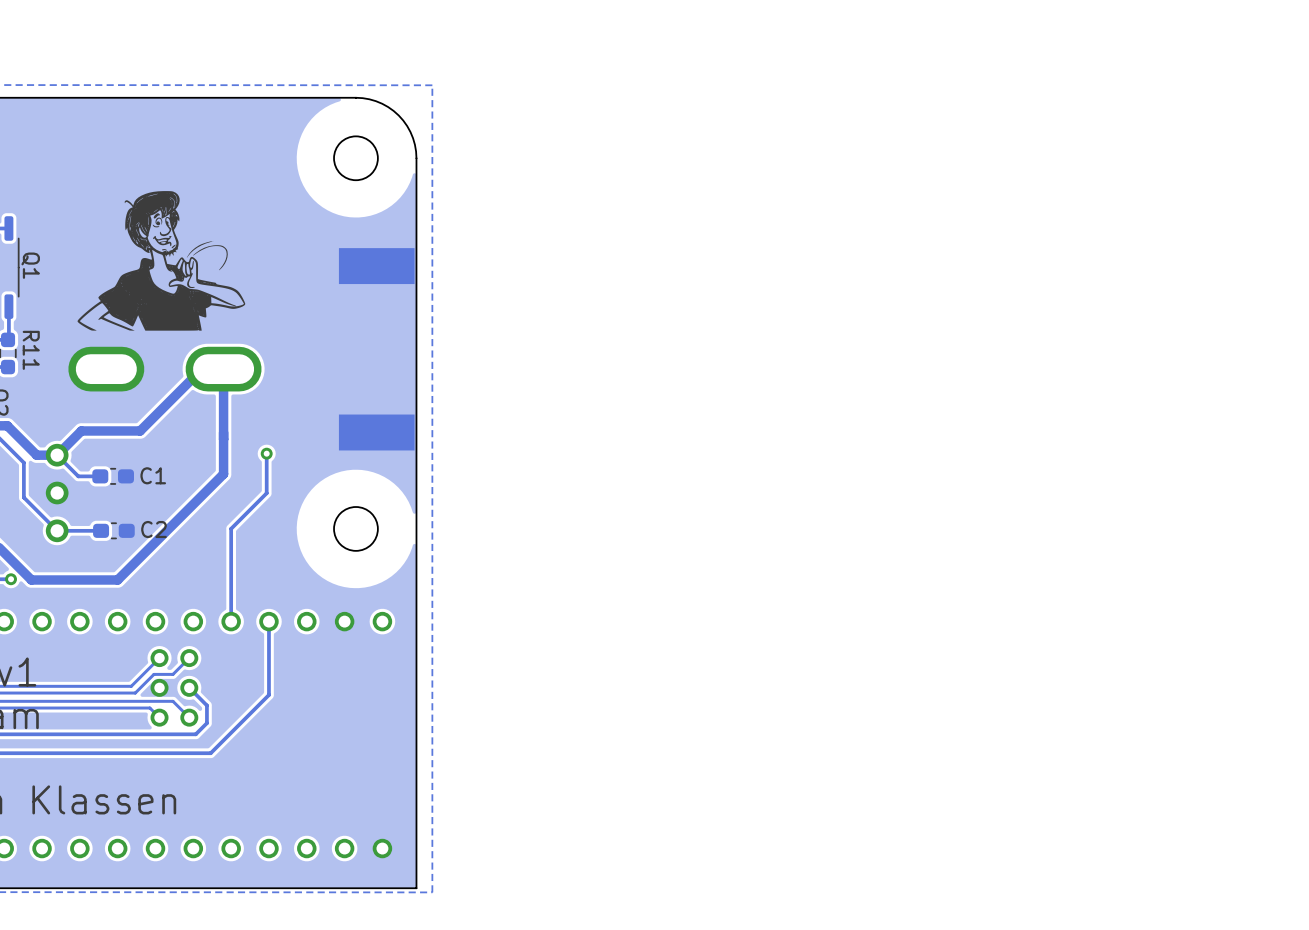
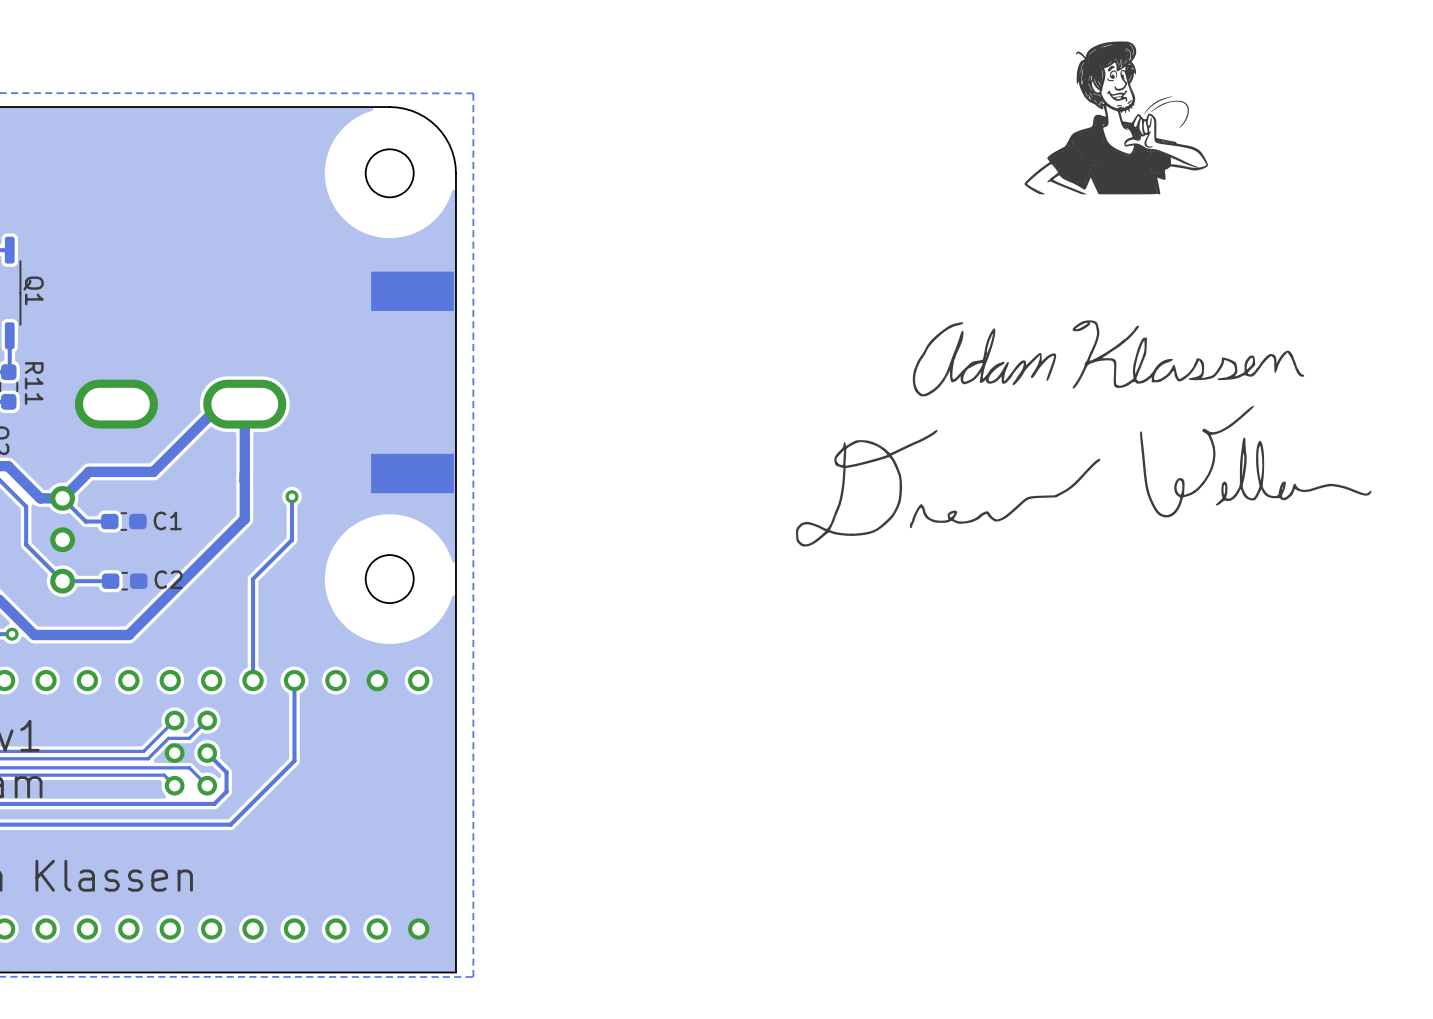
drawing: none -> [1024, 41, 1209, 195]
drawing: [77, 191, 246, 331] -> none
drawing: none -> [796, 320, 1372, 547]

